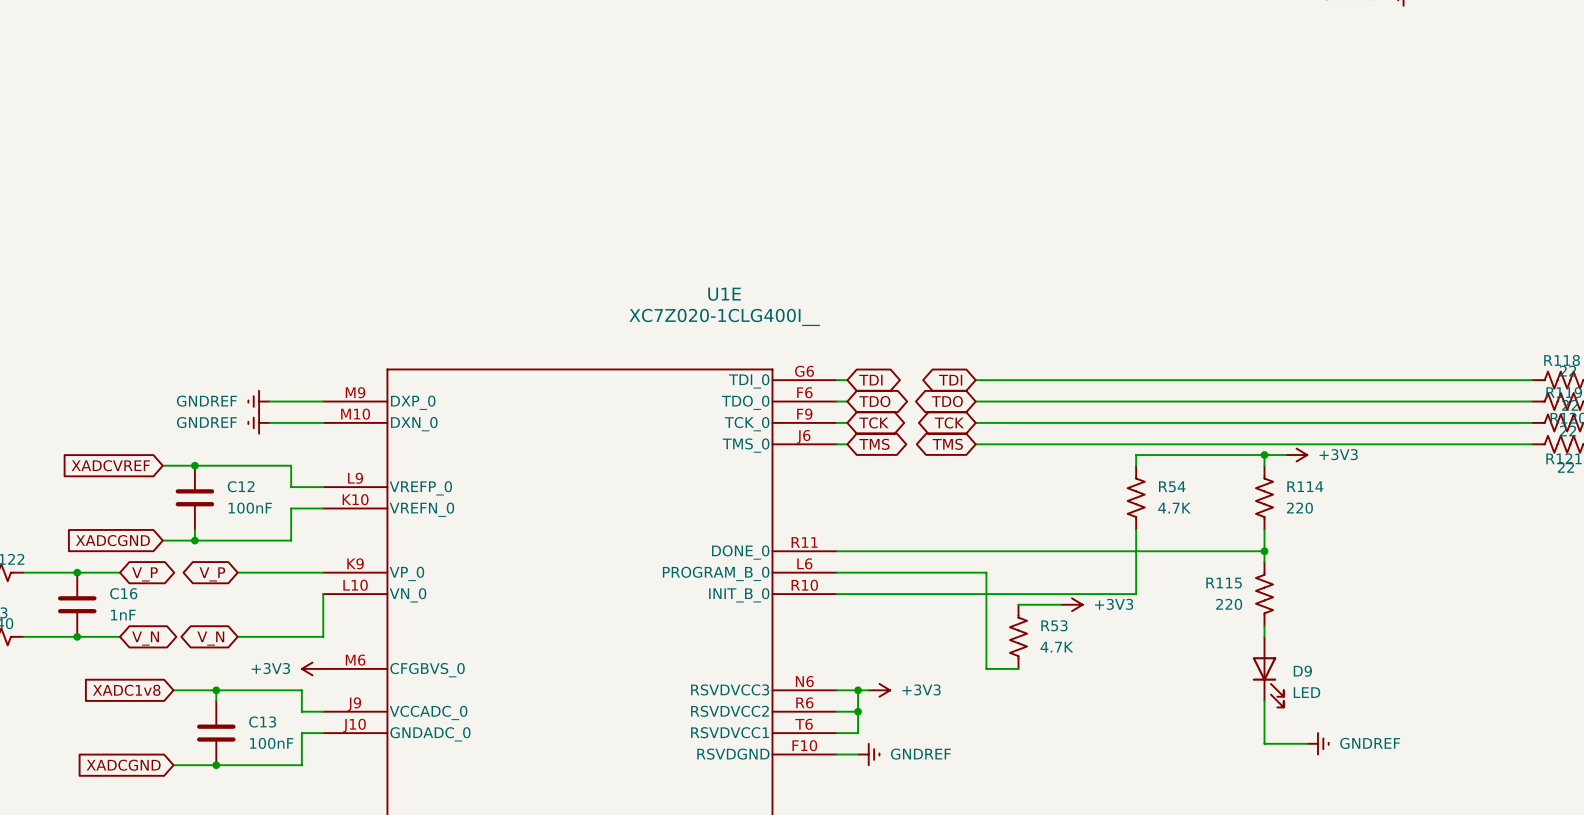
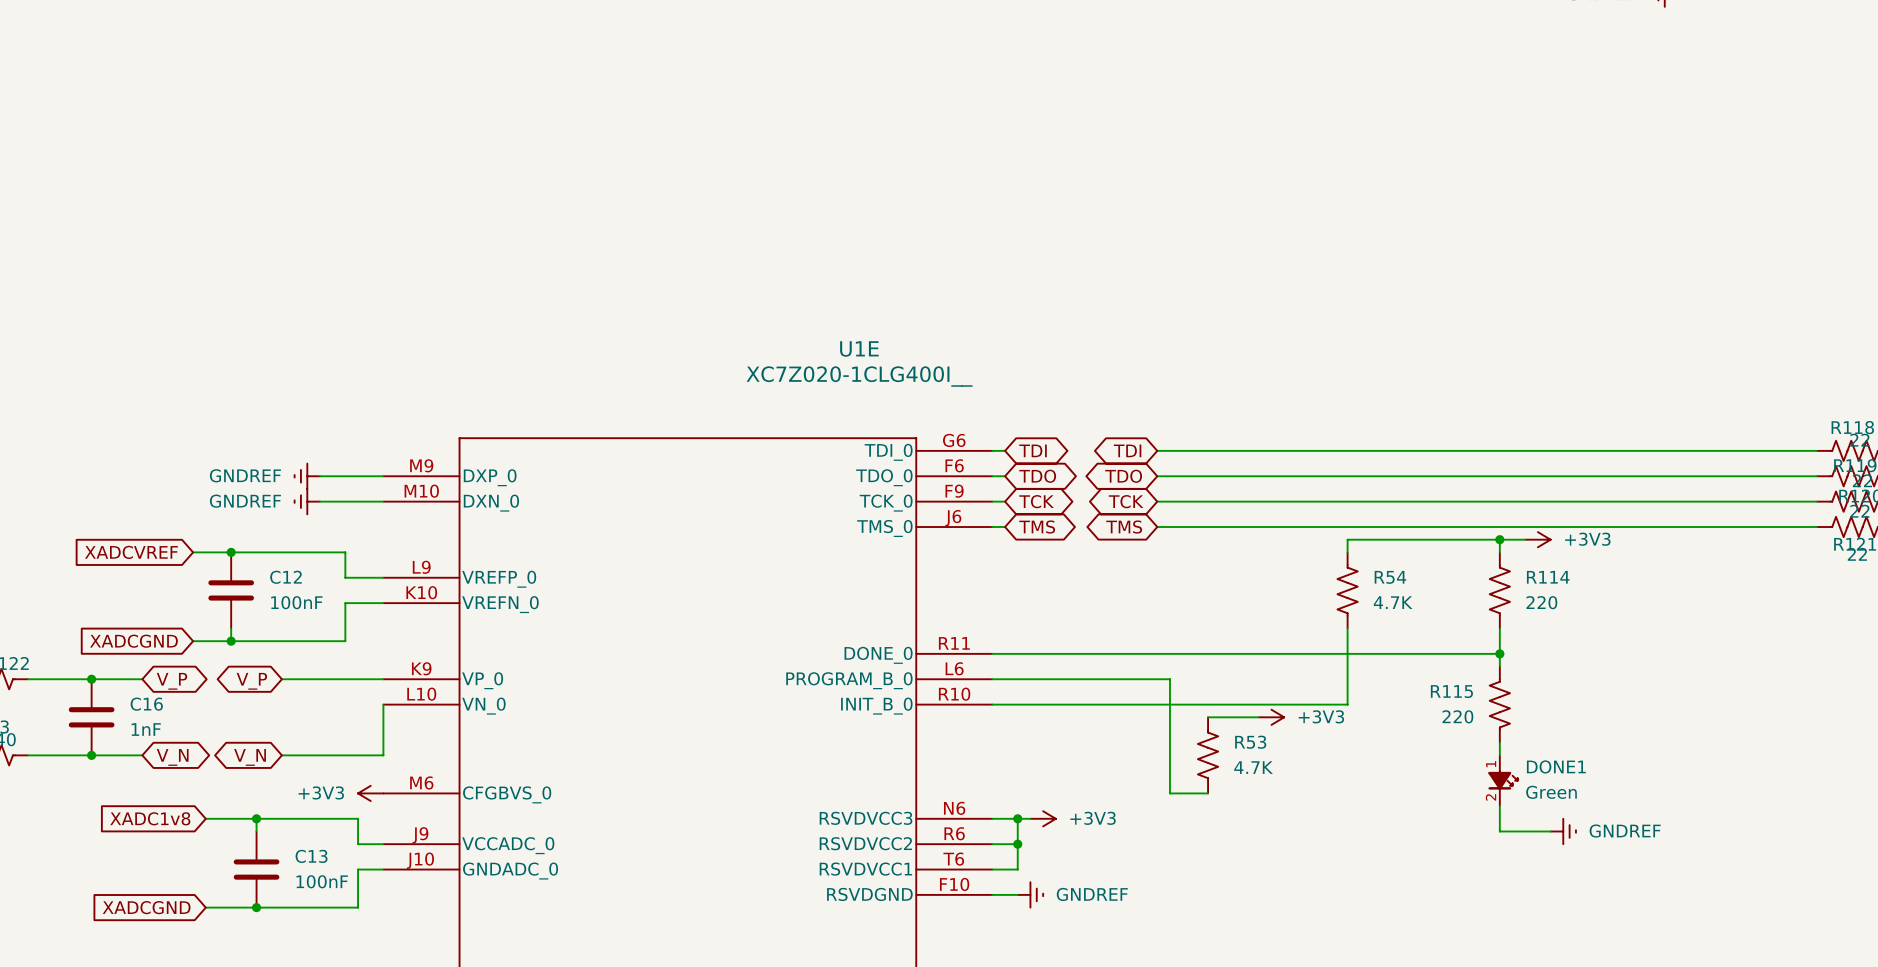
DONE1: none -> Green (1503, 780)
D9: LED (1268, 672) -> none
wire: none -> (1499, 806) (1499, 831) (1550, 831)
wire: (1264, 701) (1264, 743) (1307, 743) -> none
power symbol position: GNDREF (1317, 743) -> GNDREF (1563, 831)

